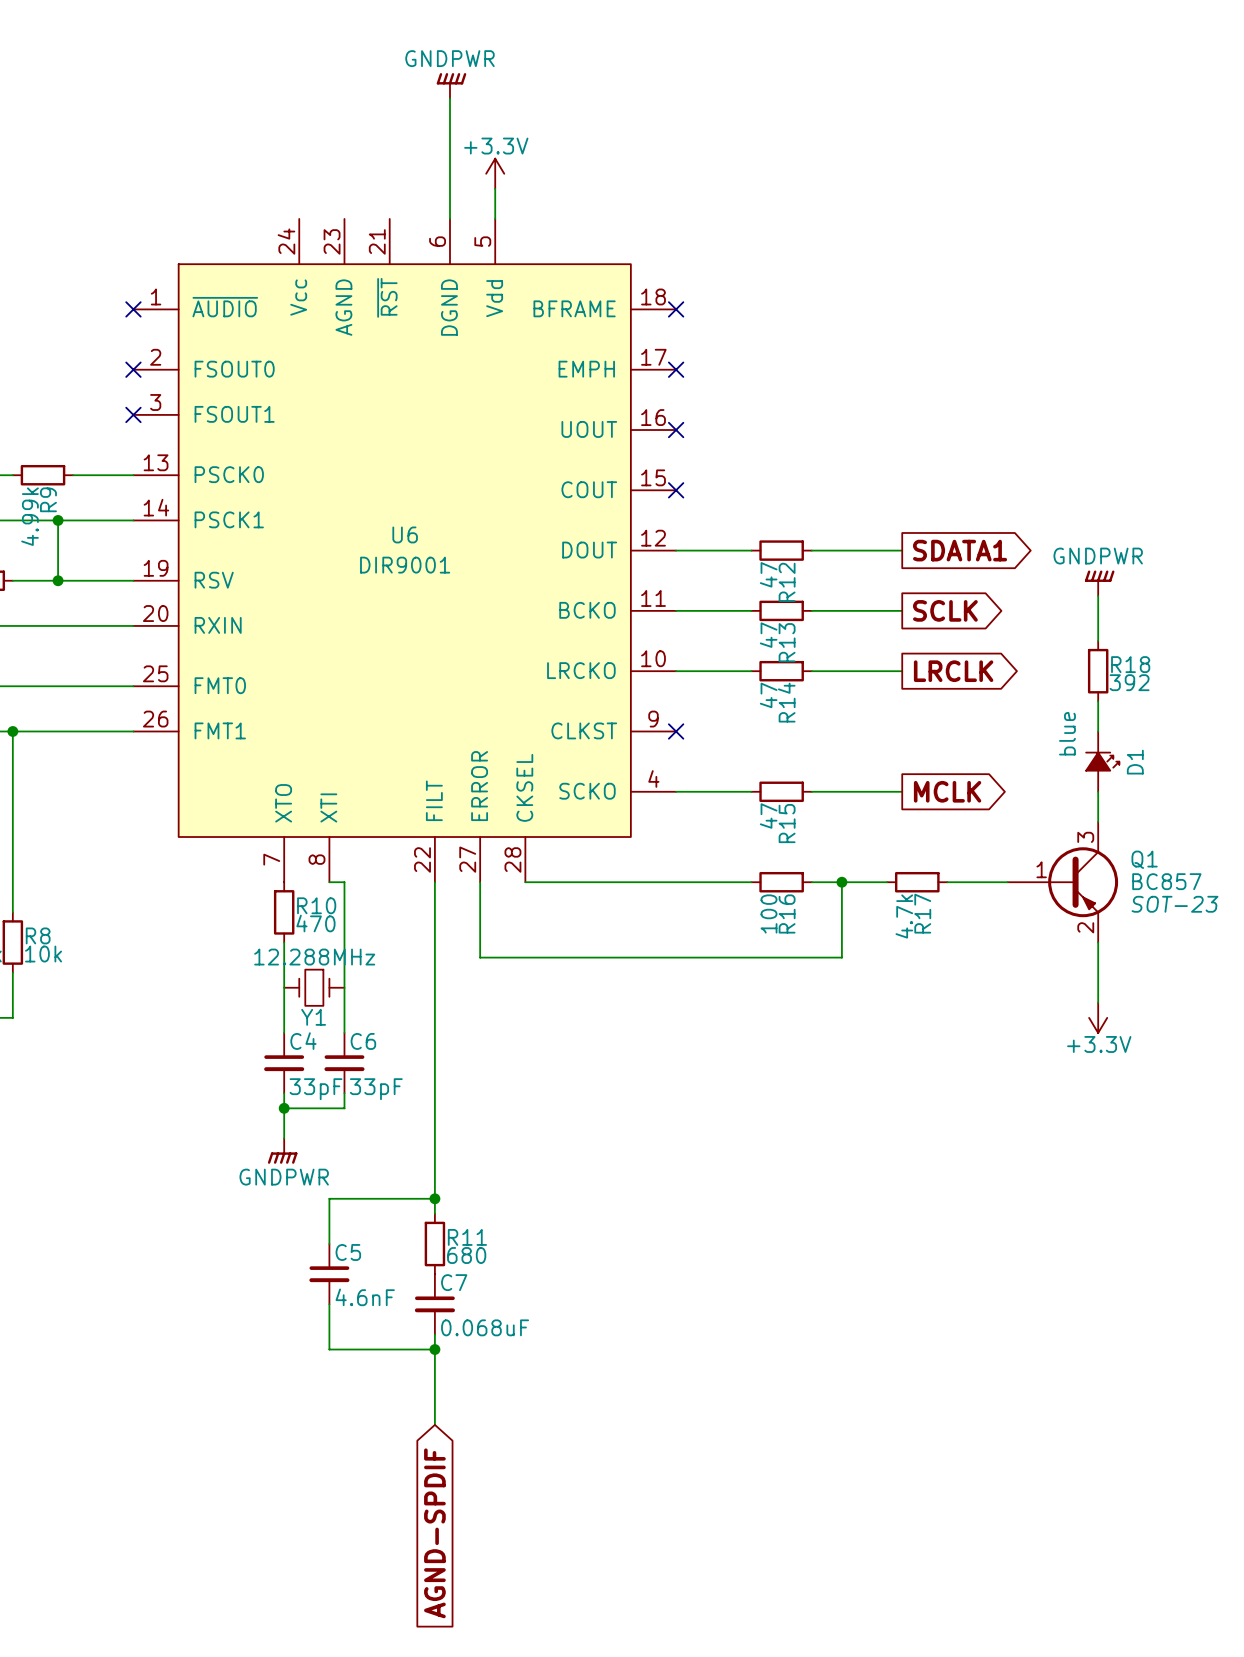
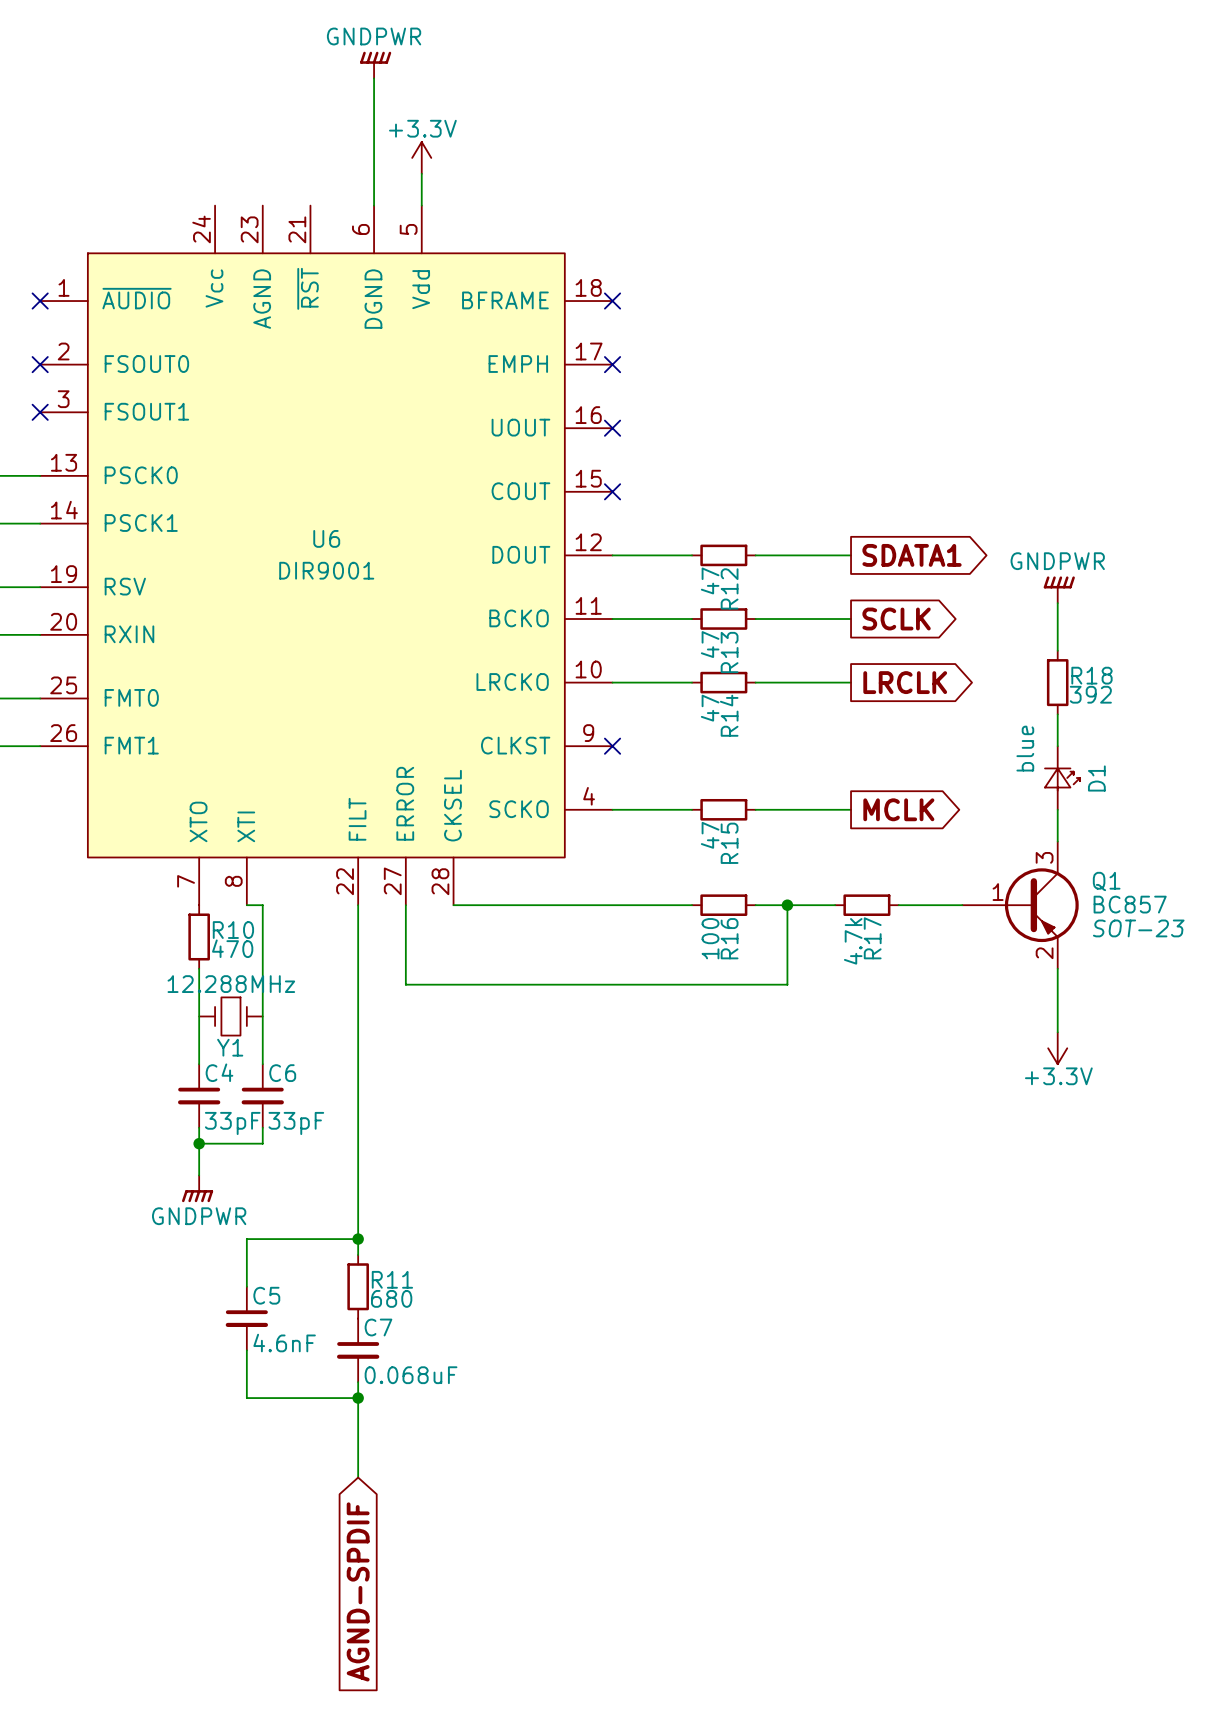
D1 symbol: [1086, 731, 1120, 792] -> [1044, 746, 1080, 810]

